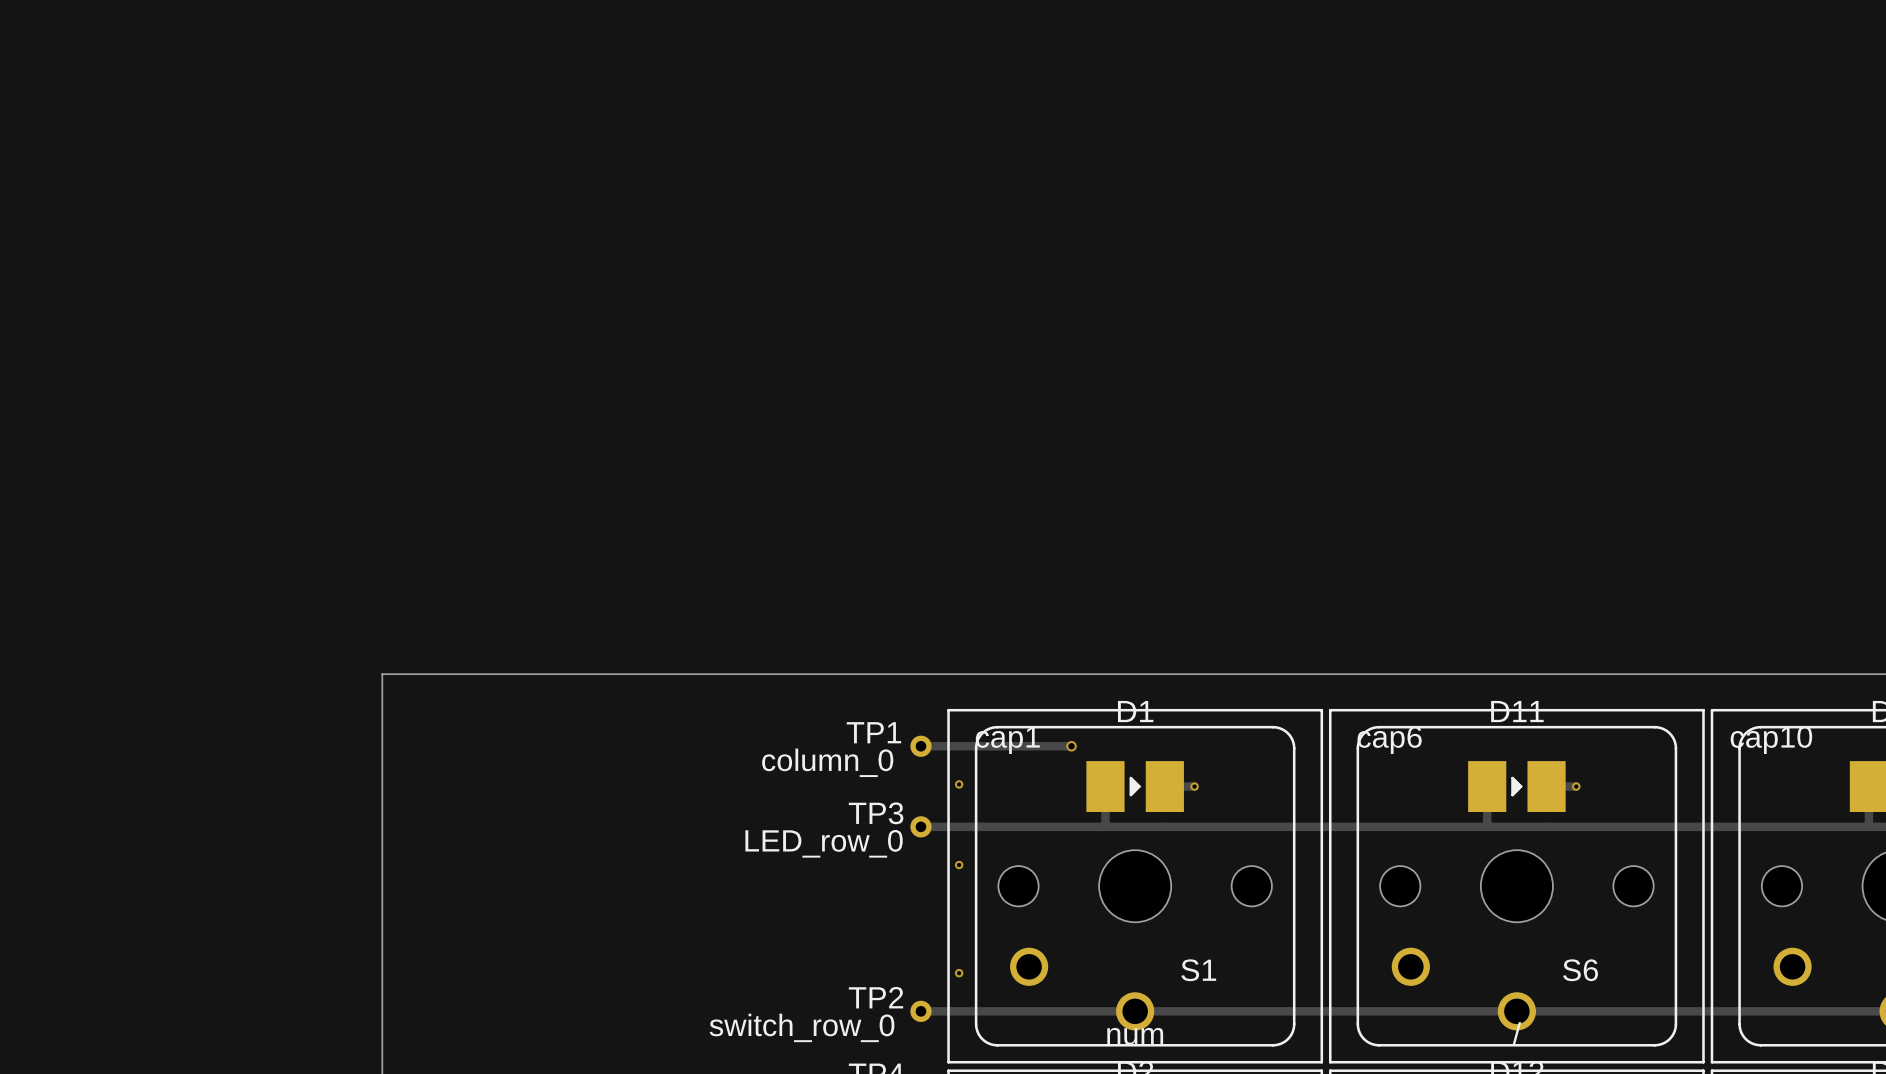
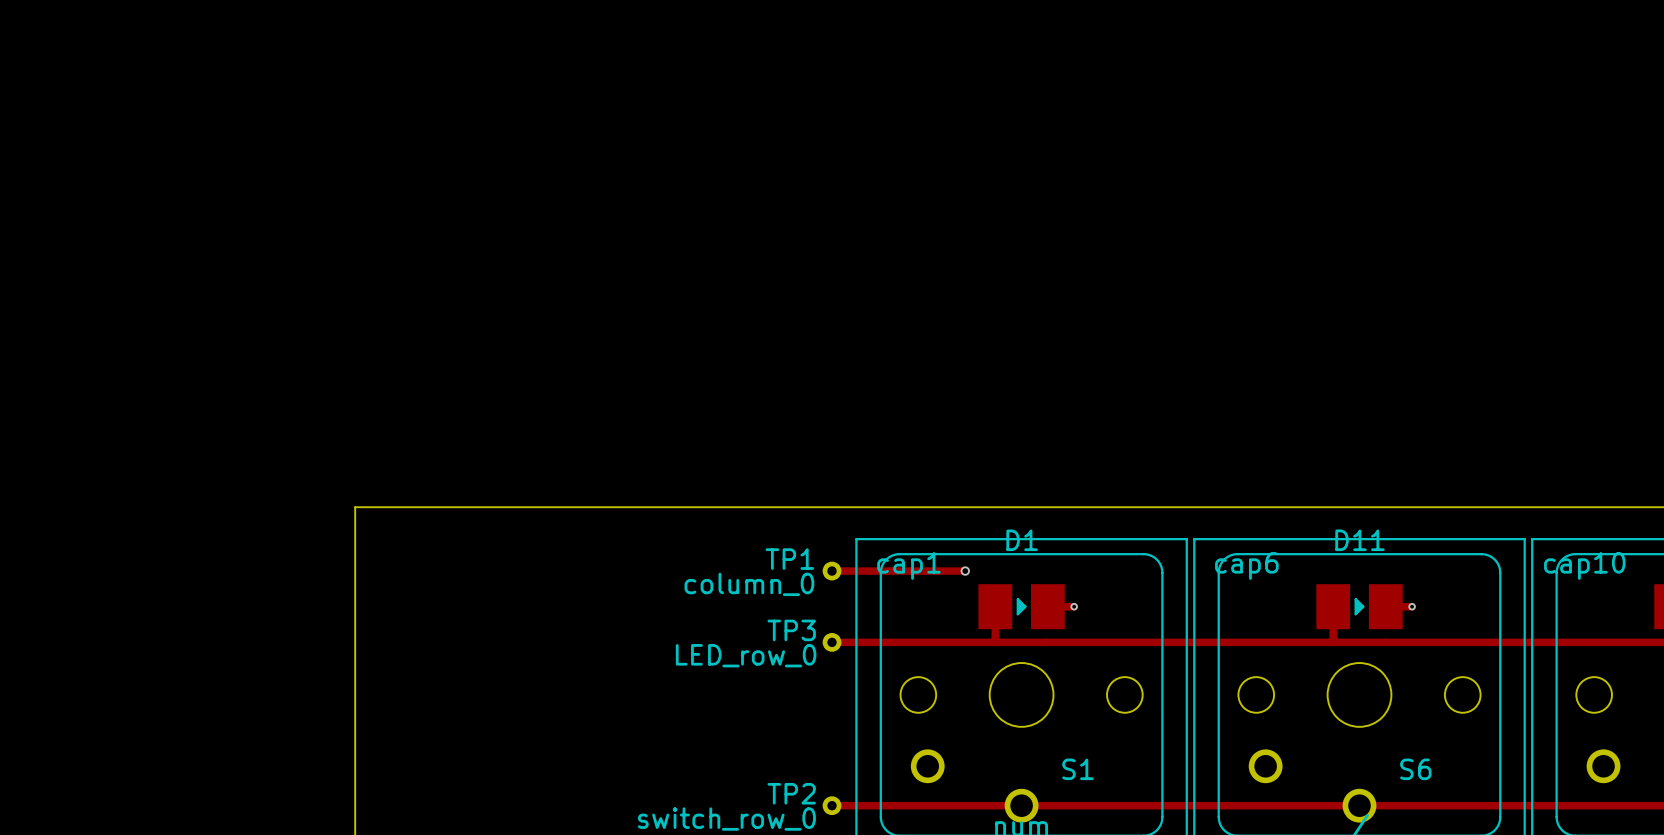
via: (959, 784) -> none
via: (959, 865) -> none
via: (959, 973) -> none

